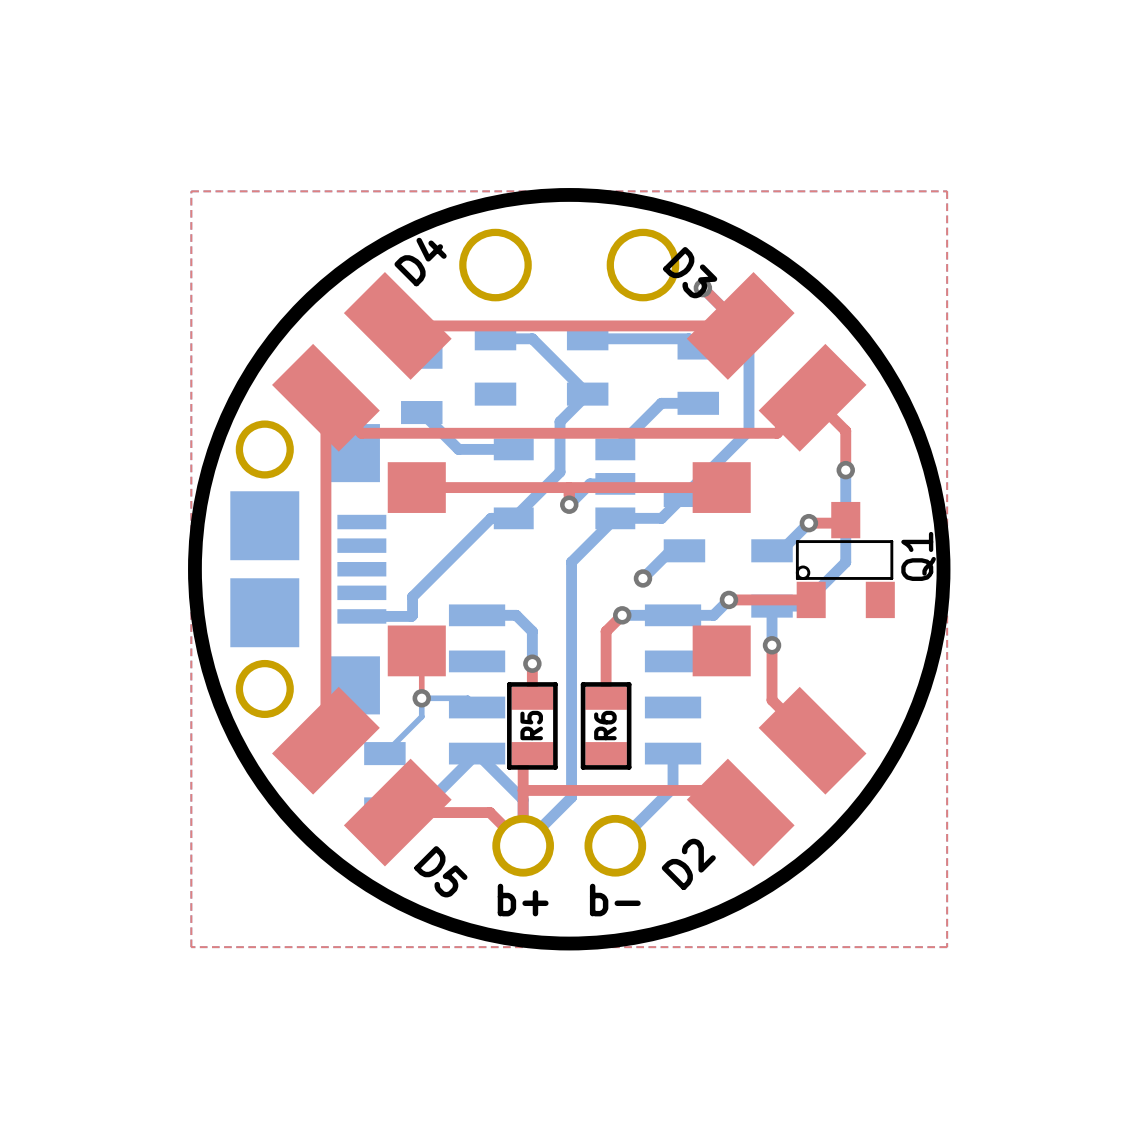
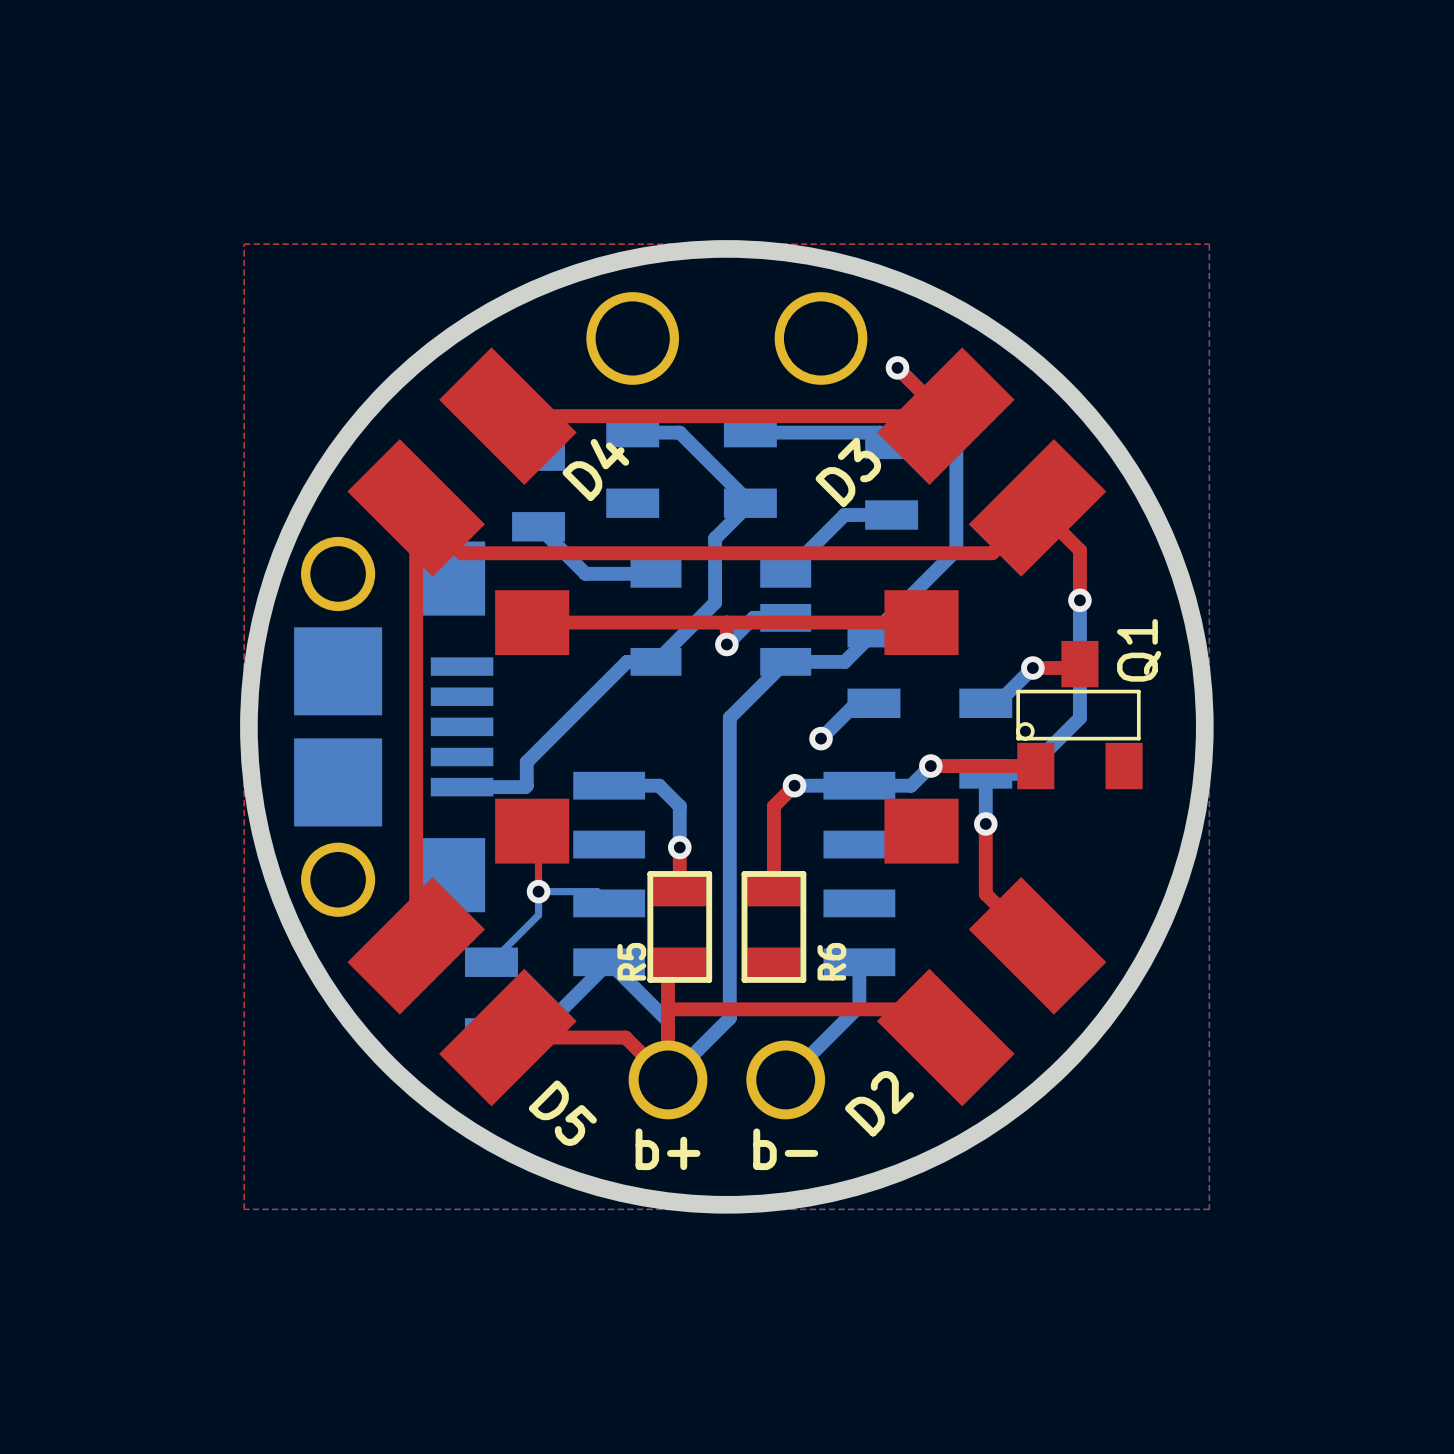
D4 name position: D4 (420, 262) -> D4 (595, 469)
D3 name rotation: 0° (690, 272) -> 90° counterclockwise (848, 472)
D3 name position: D3 (690, 272) -> D3 (848, 472)
Q1 name position: Q1 (918, 556) -> Q1 (1139, 650)
R5 name position: R5 (531, 725) -> R5 (631, 961)
R6 name position: R6 (605, 725) -> R6 (831, 961)

